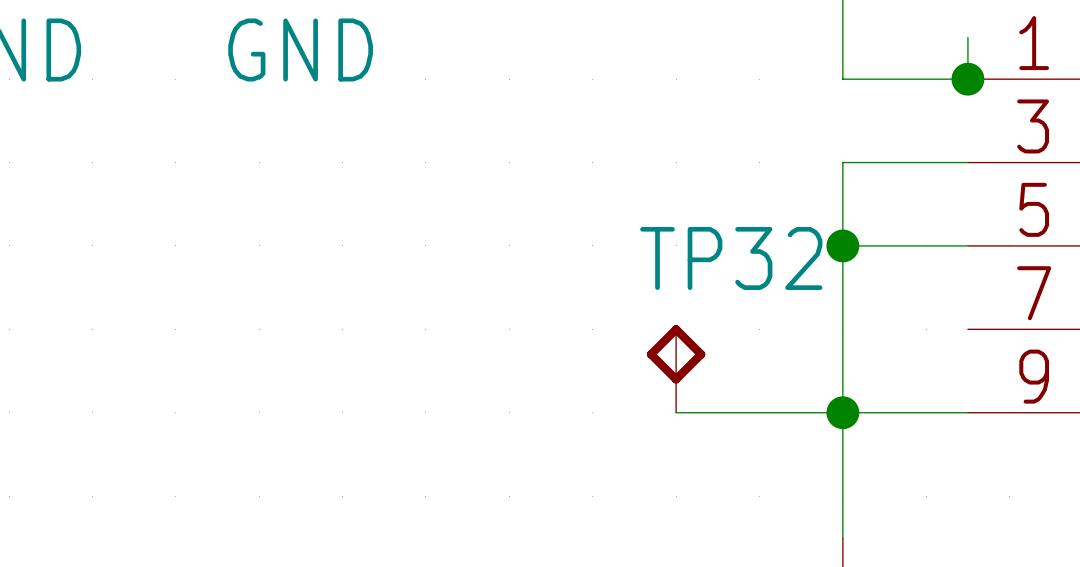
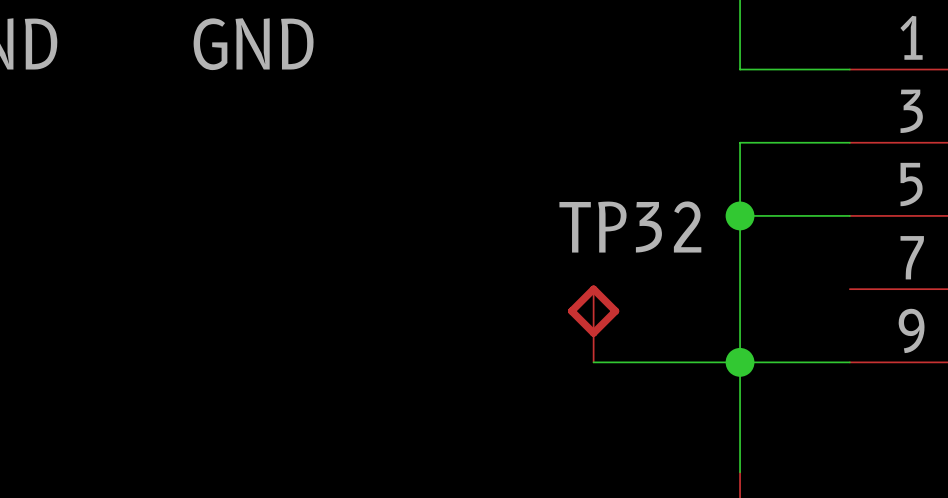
wire: (967, 37) (967, 79) -> none
junction: (967, 79) -> none

